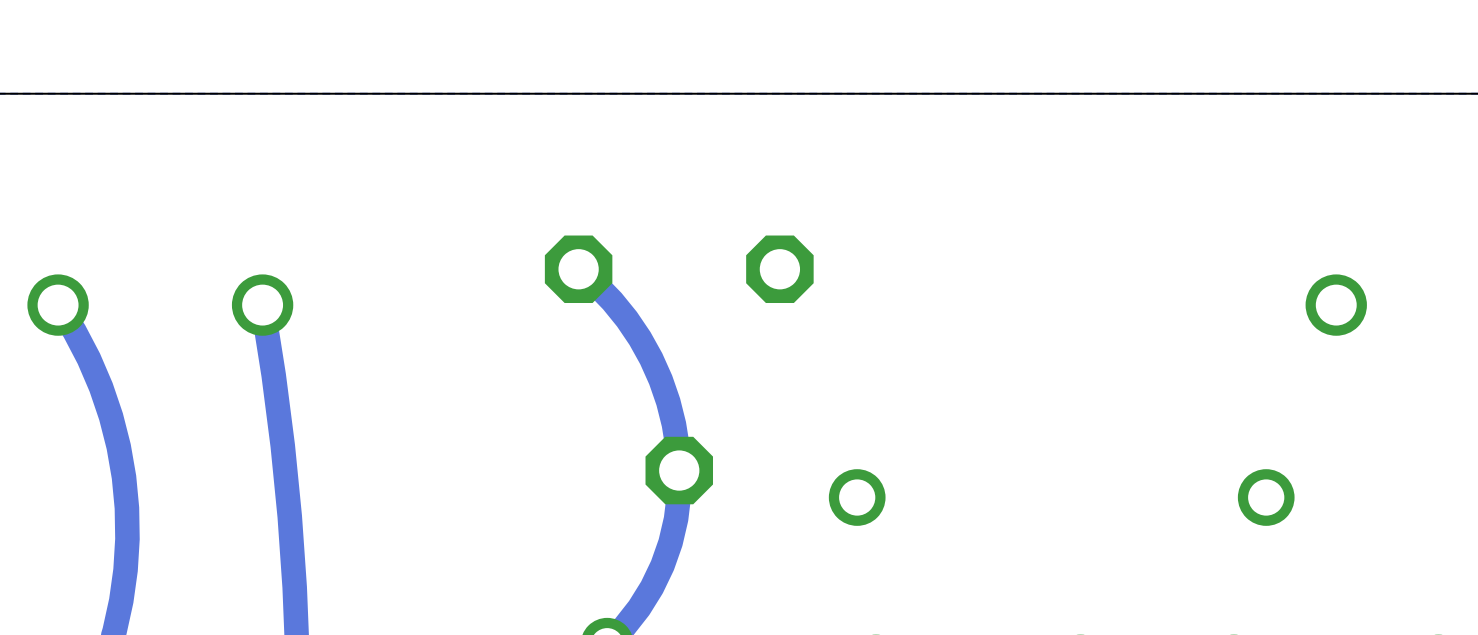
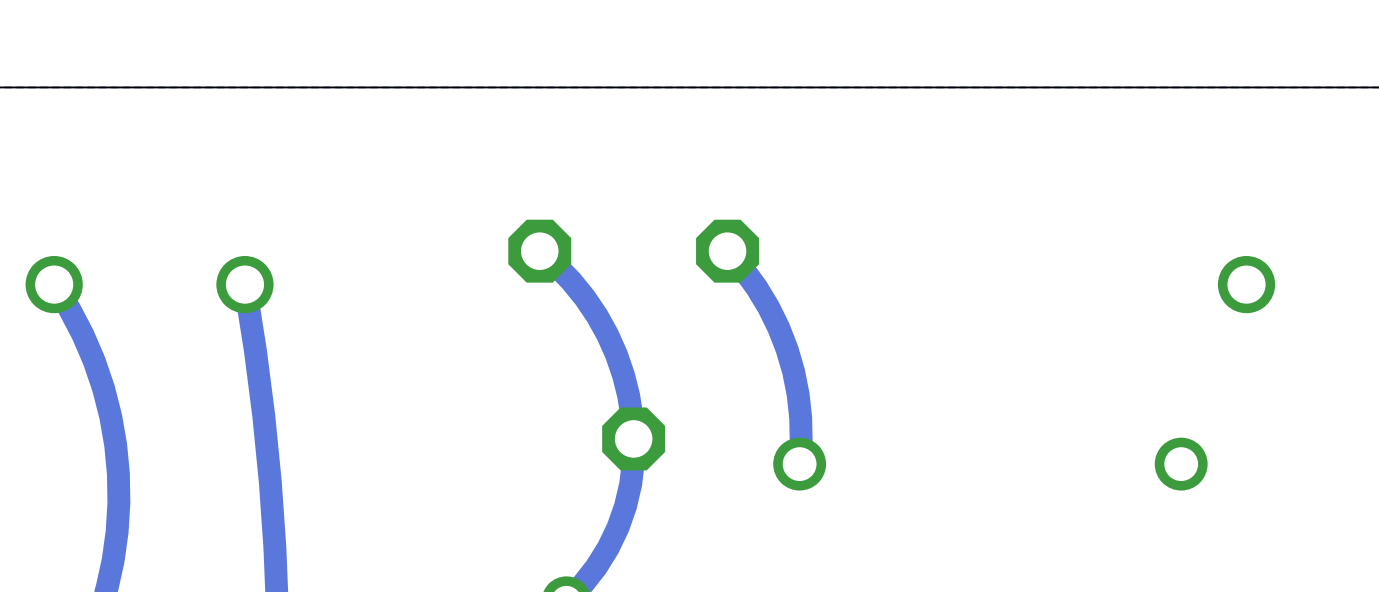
track: none -> (727, 251) (756, 287) (768, 307) (787, 349) (793, 371) (800, 417) (799, 464)

